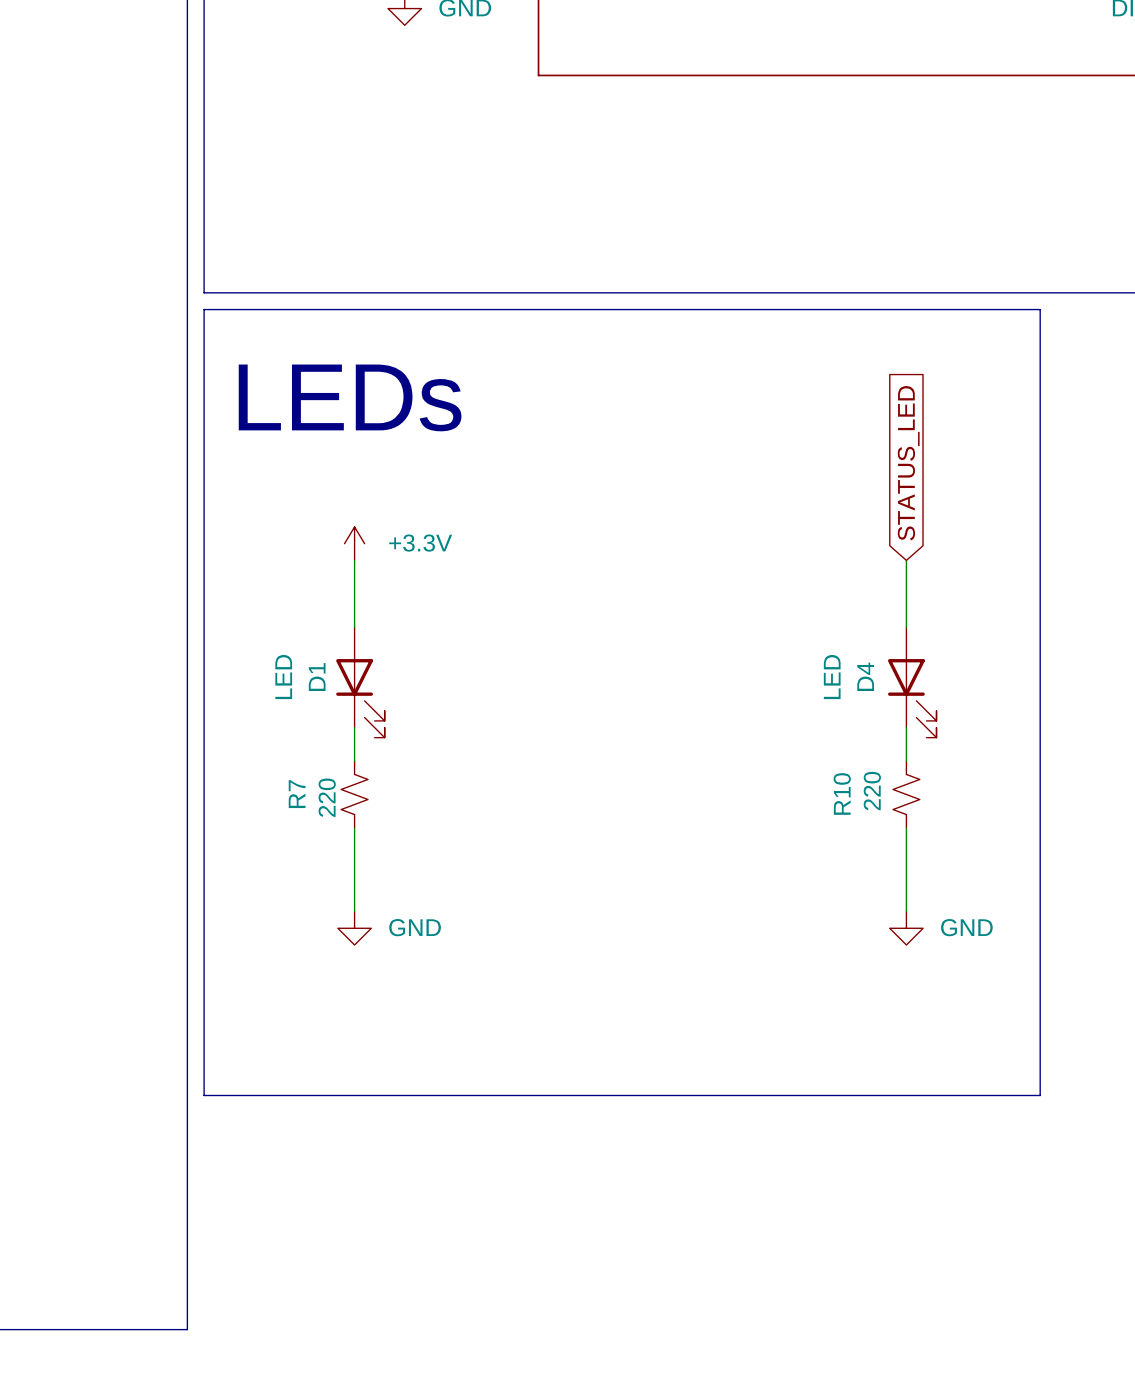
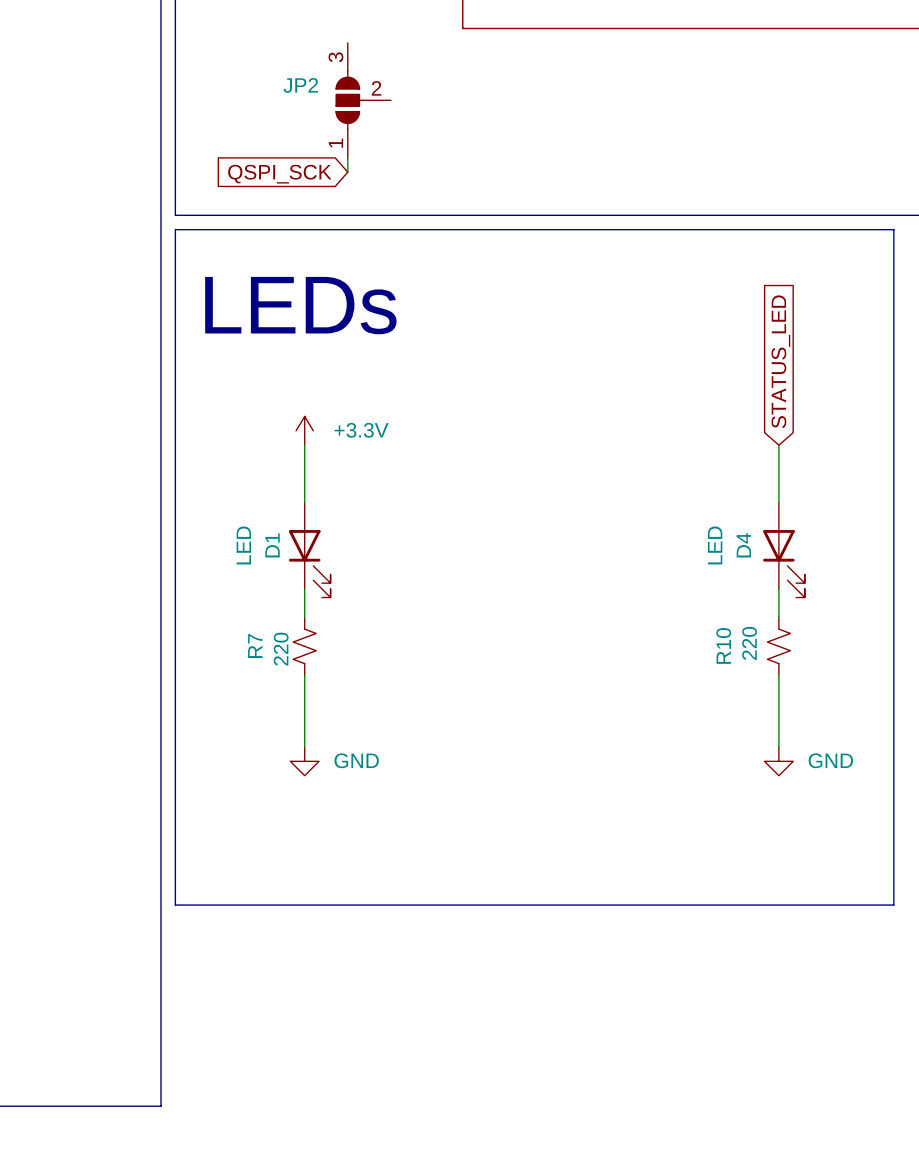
JP2: none -> (363, 100)
wire: none -> (347, 157) (347, 172)
global label: none -> QSPI_SCK (279, 174)

